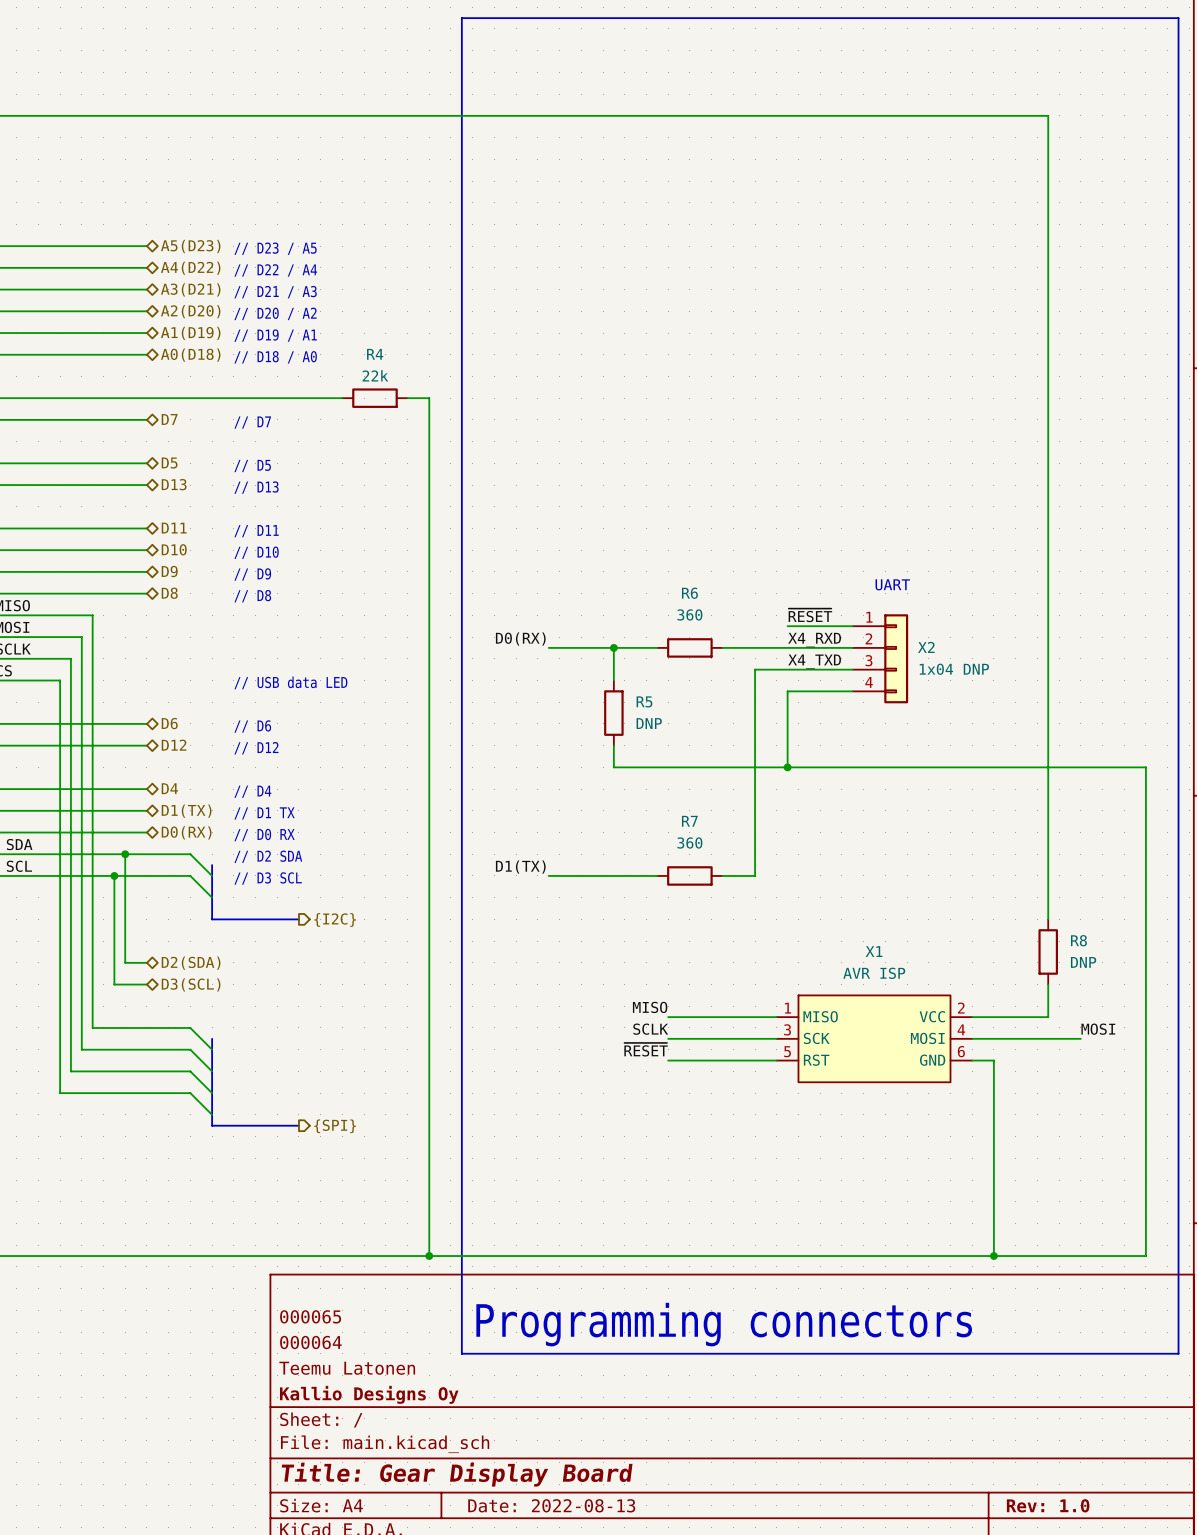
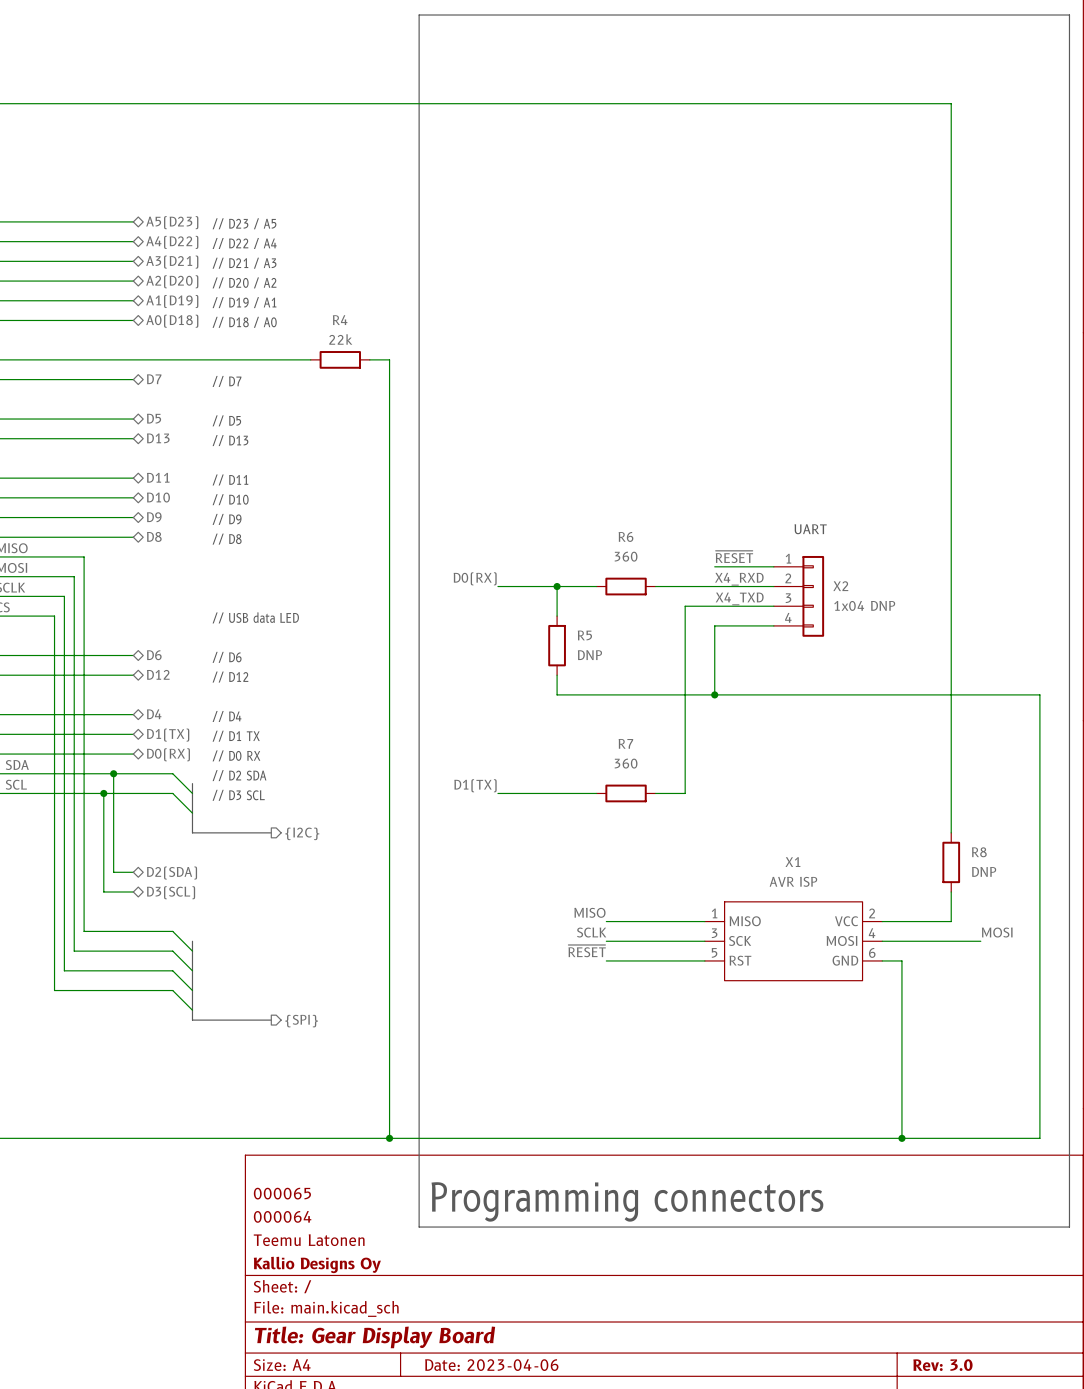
title block: Date: 2022-08-13 (551, 1505) -> Date: 2023-04-06 (491, 1365)
title block: Rev: 1.0 (1048, 1505) -> Rev: 3.0 (942, 1365)

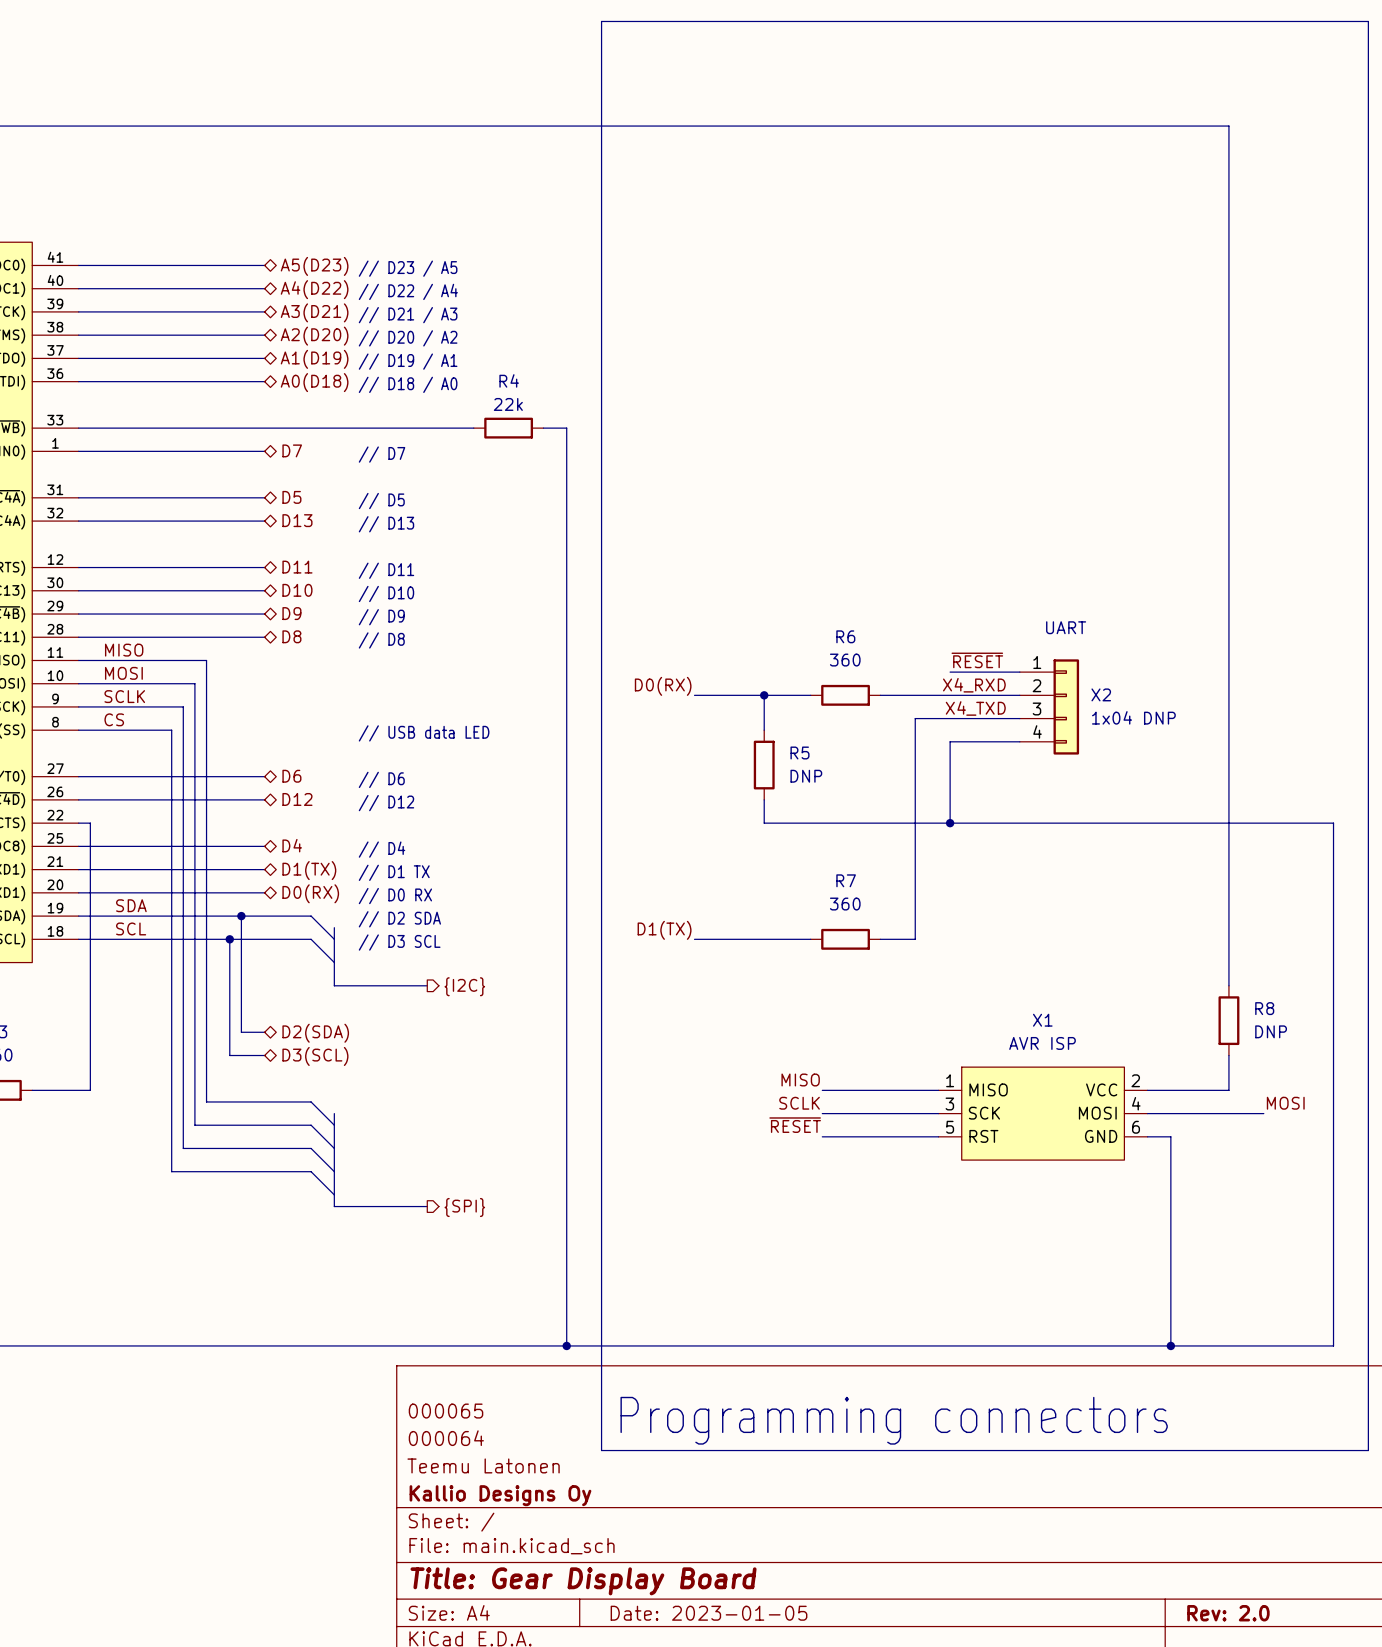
title block: Date: 2023-04-06 (491, 1365) -> Date: 2023-01-05 (709, 1613)
title block: Rev: 3.0 (942, 1365) -> Rev: 2.0 (1228, 1613)

